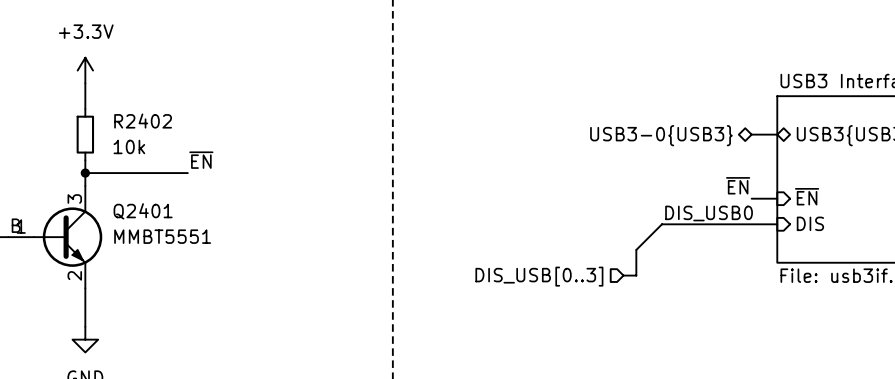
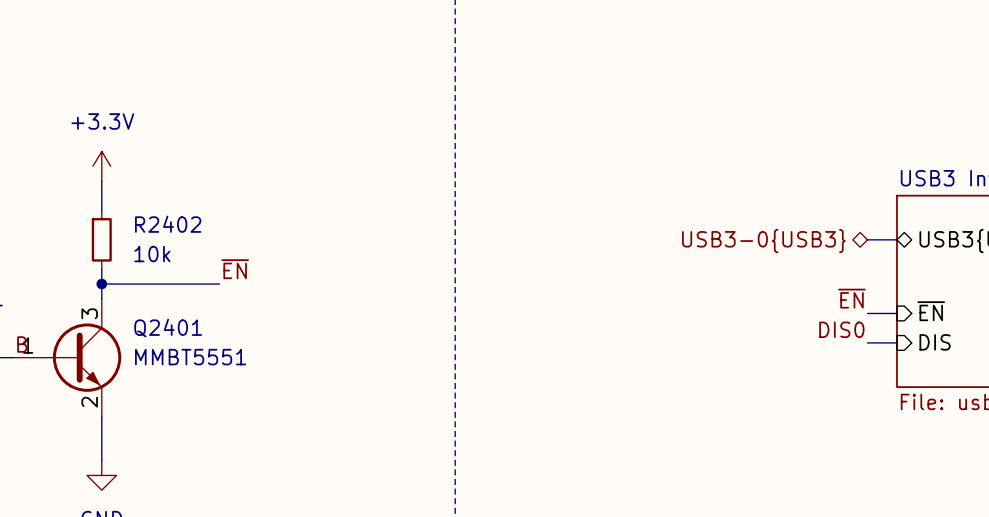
label: DIS_USB0 (709, 213) -> DIS0 (841, 329)
wire: (751, 224) (661, 224) (636, 249) -> none
bus: (636, 249) (636, 275) (623, 275) -> none
hierarchical label: DIS_USB[0..3] (539, 276) -> none

